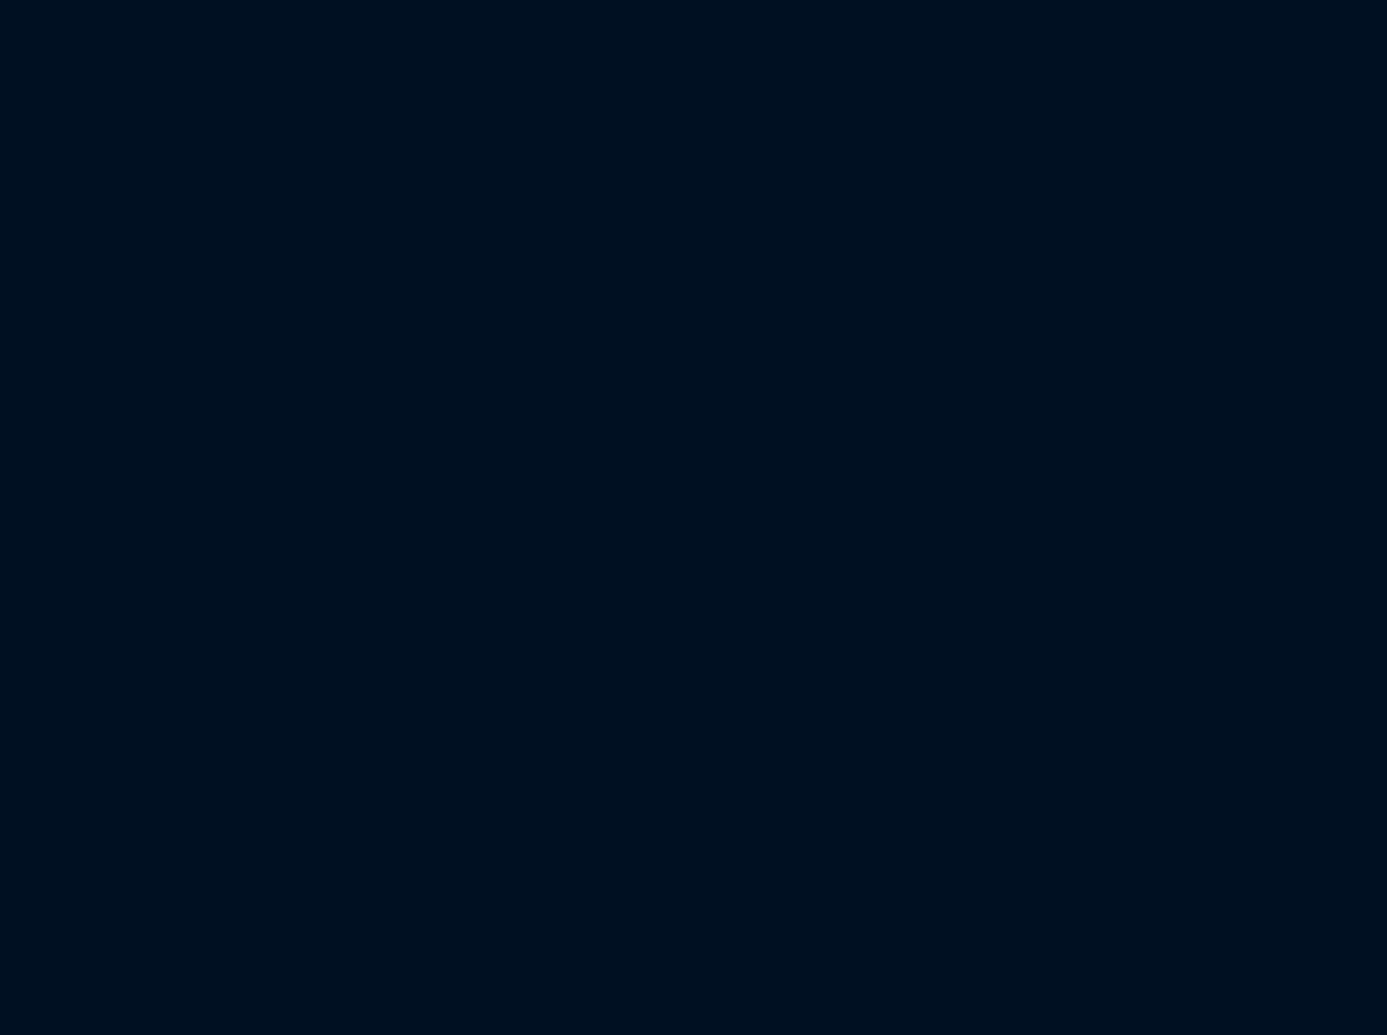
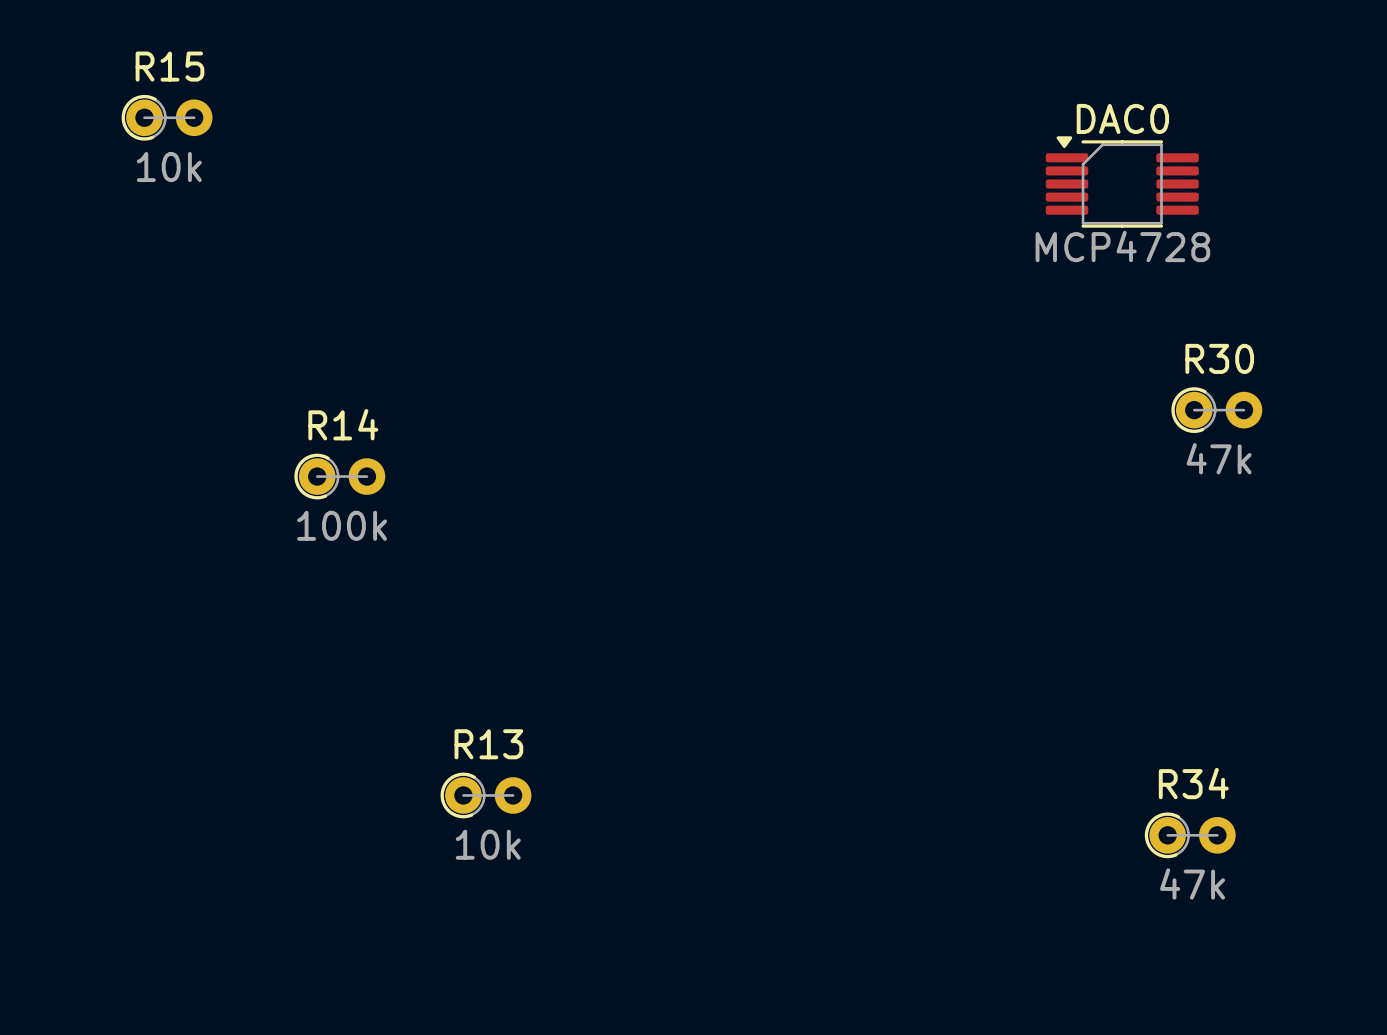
R15: none -> 10k (167, 117)
DAC0: none -> MCP4728 (1122, 181)
R30: none -> 47k (1216, 410)
R14: none -> 100k (339, 476)
R13: none -> 10k (485, 795)
R34: none -> 47k (1190, 835)

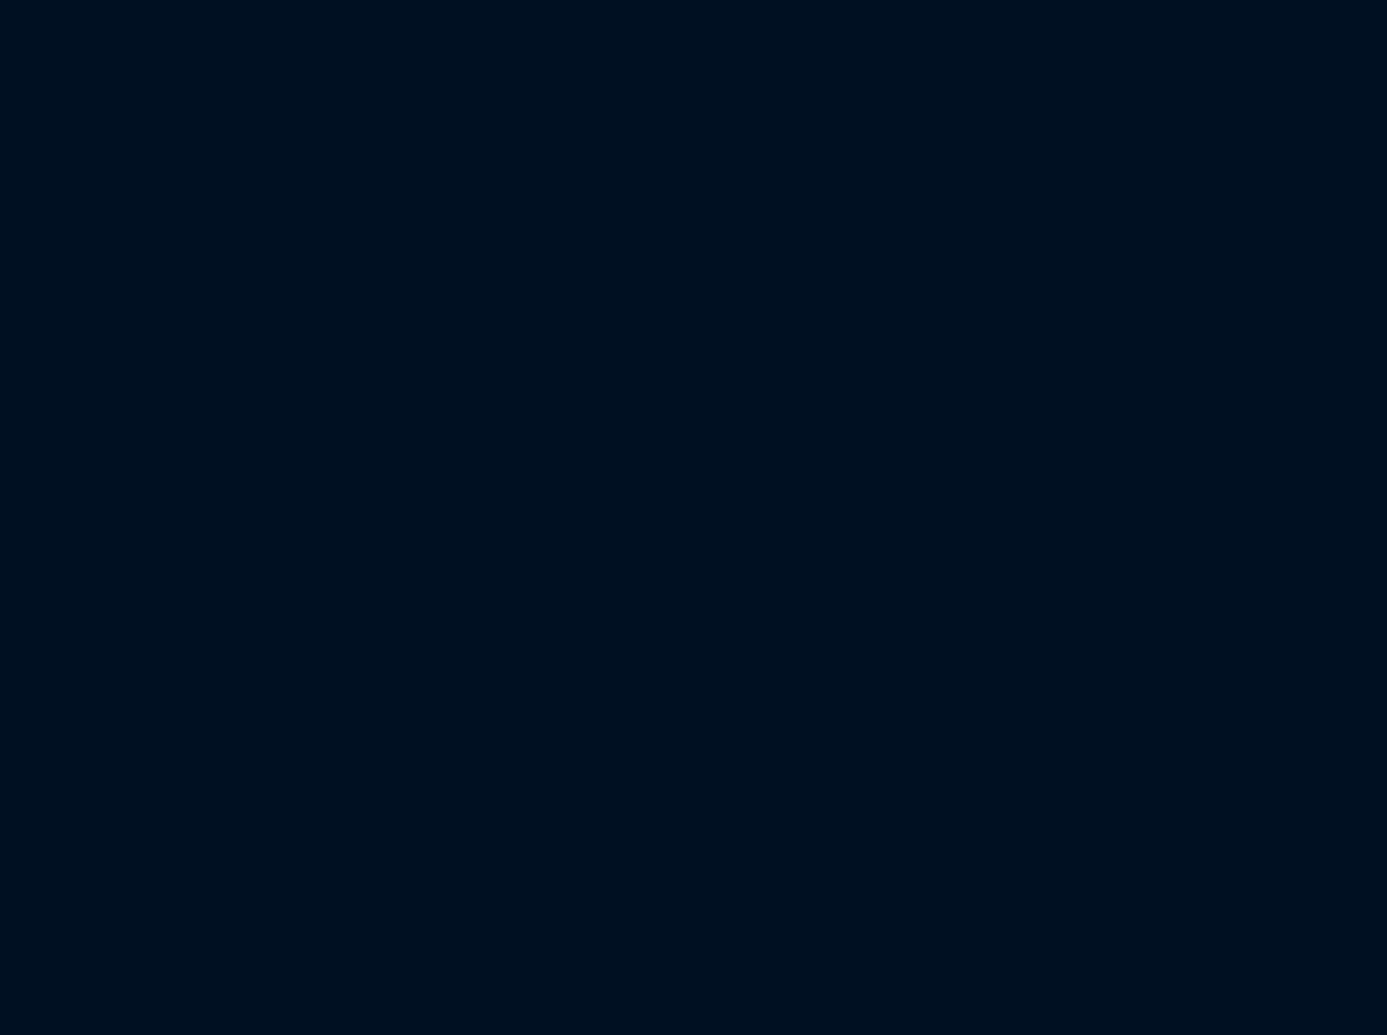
R15: 10k (167, 117) -> none
DAC0: MCP4728 (1122, 181) -> none
R30: 47k (1216, 410) -> none
R14: 100k (339, 476) -> none
R13: 10k (485, 795) -> none
R34: 47k (1190, 835) -> none

